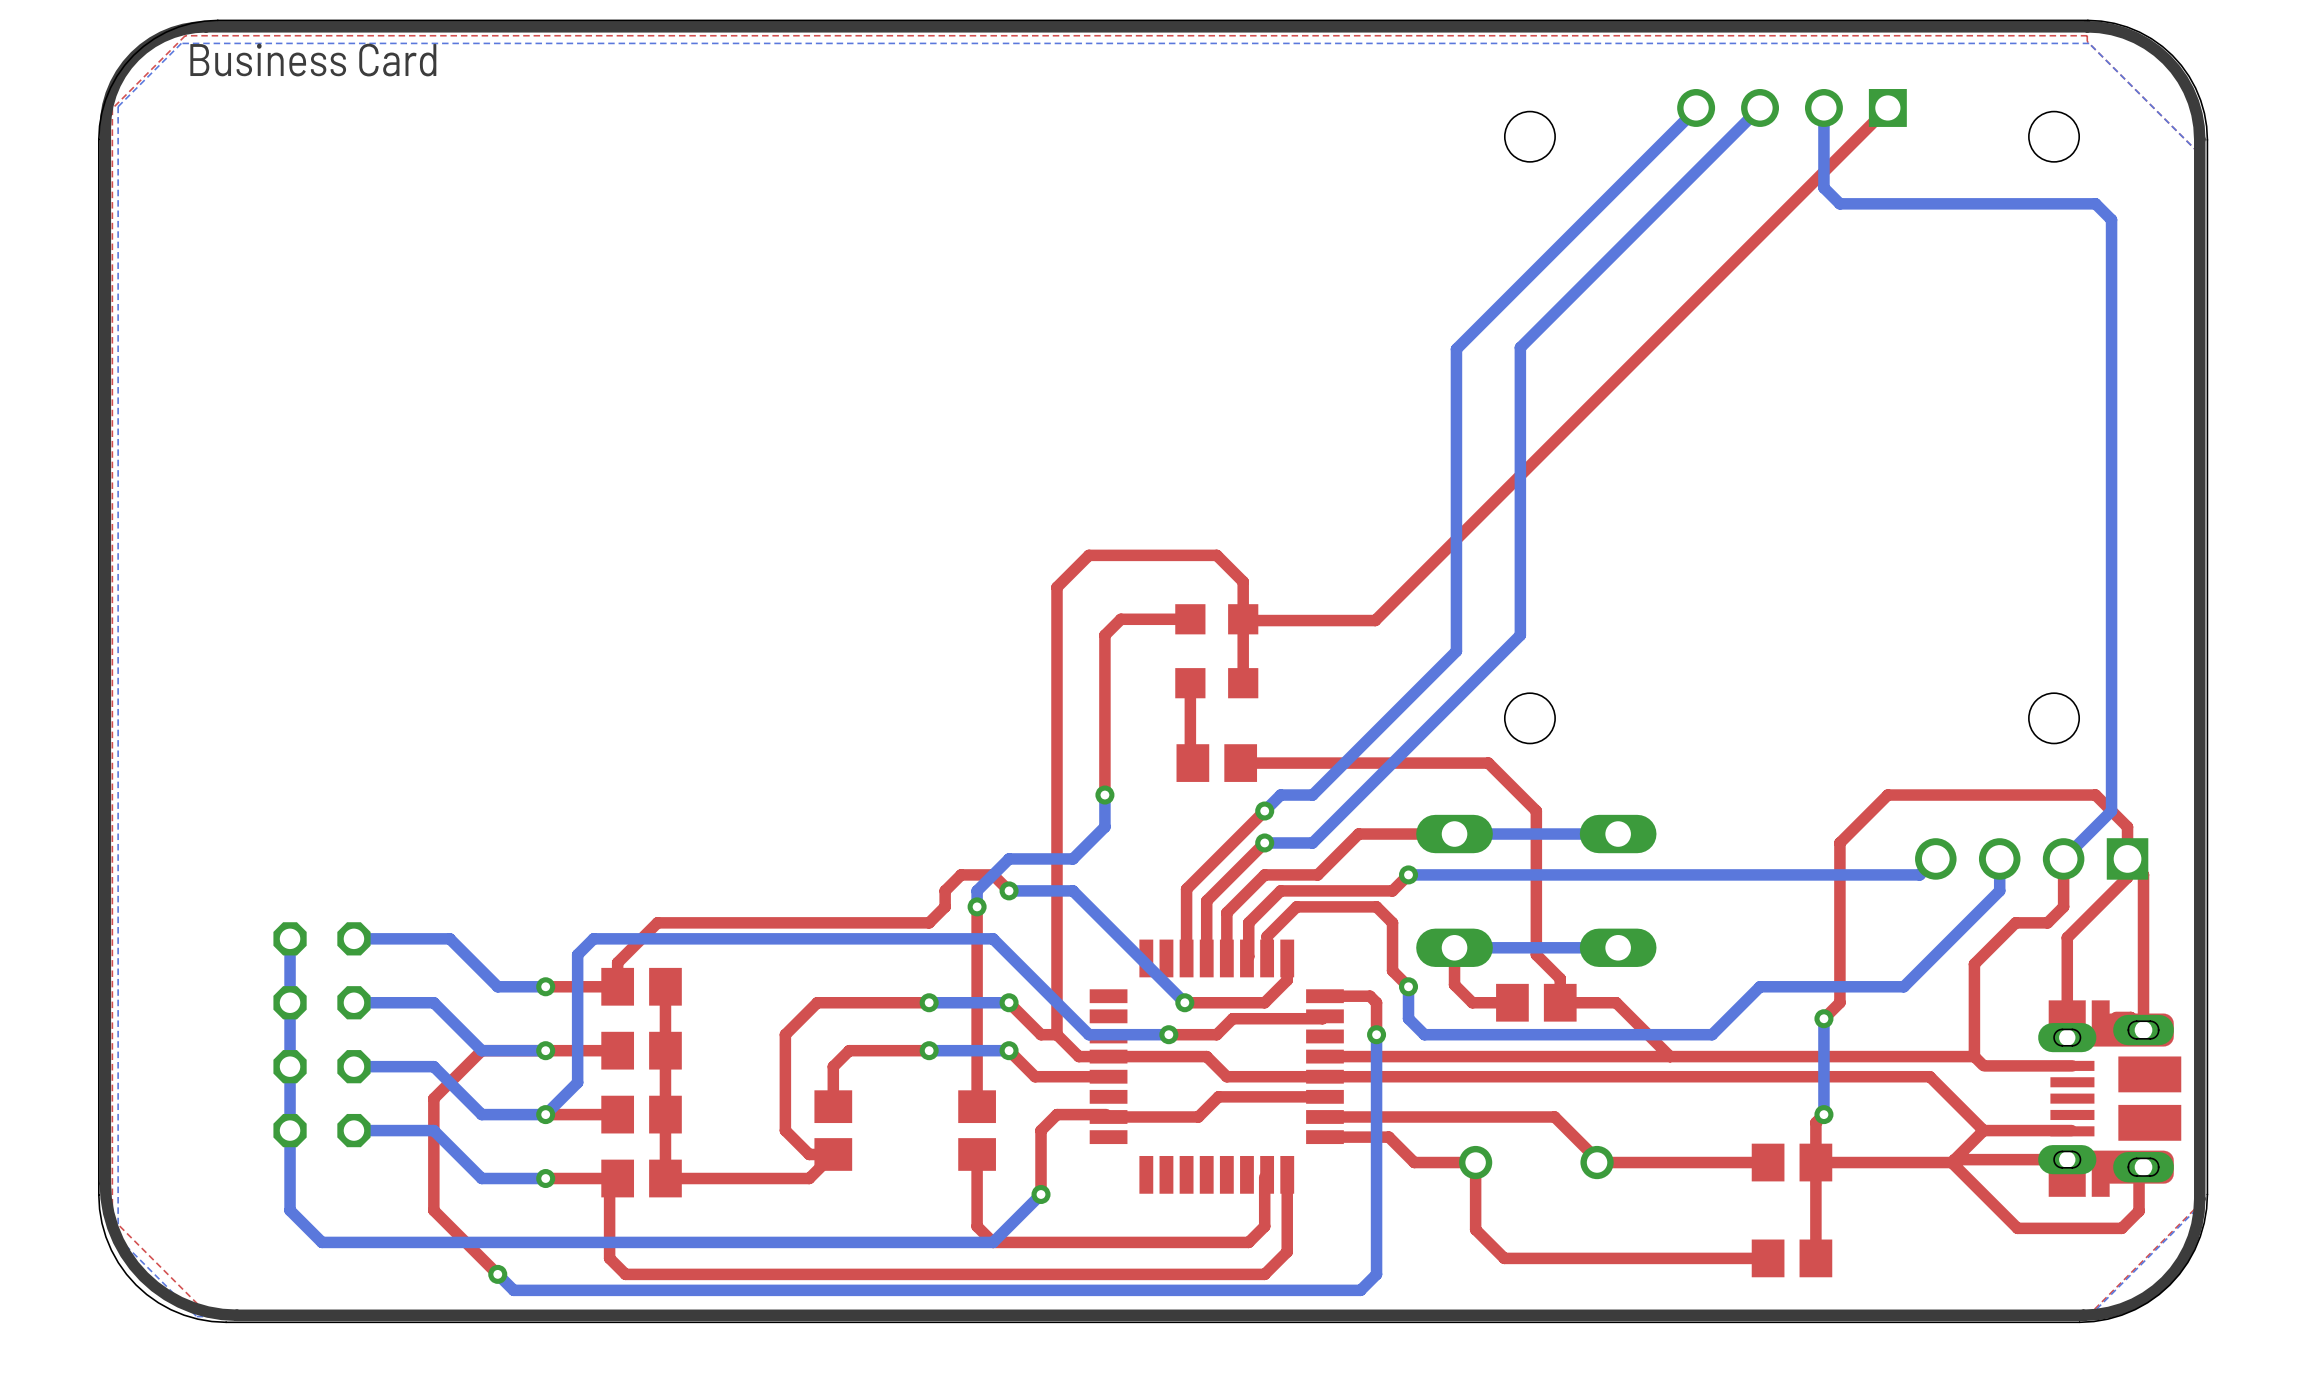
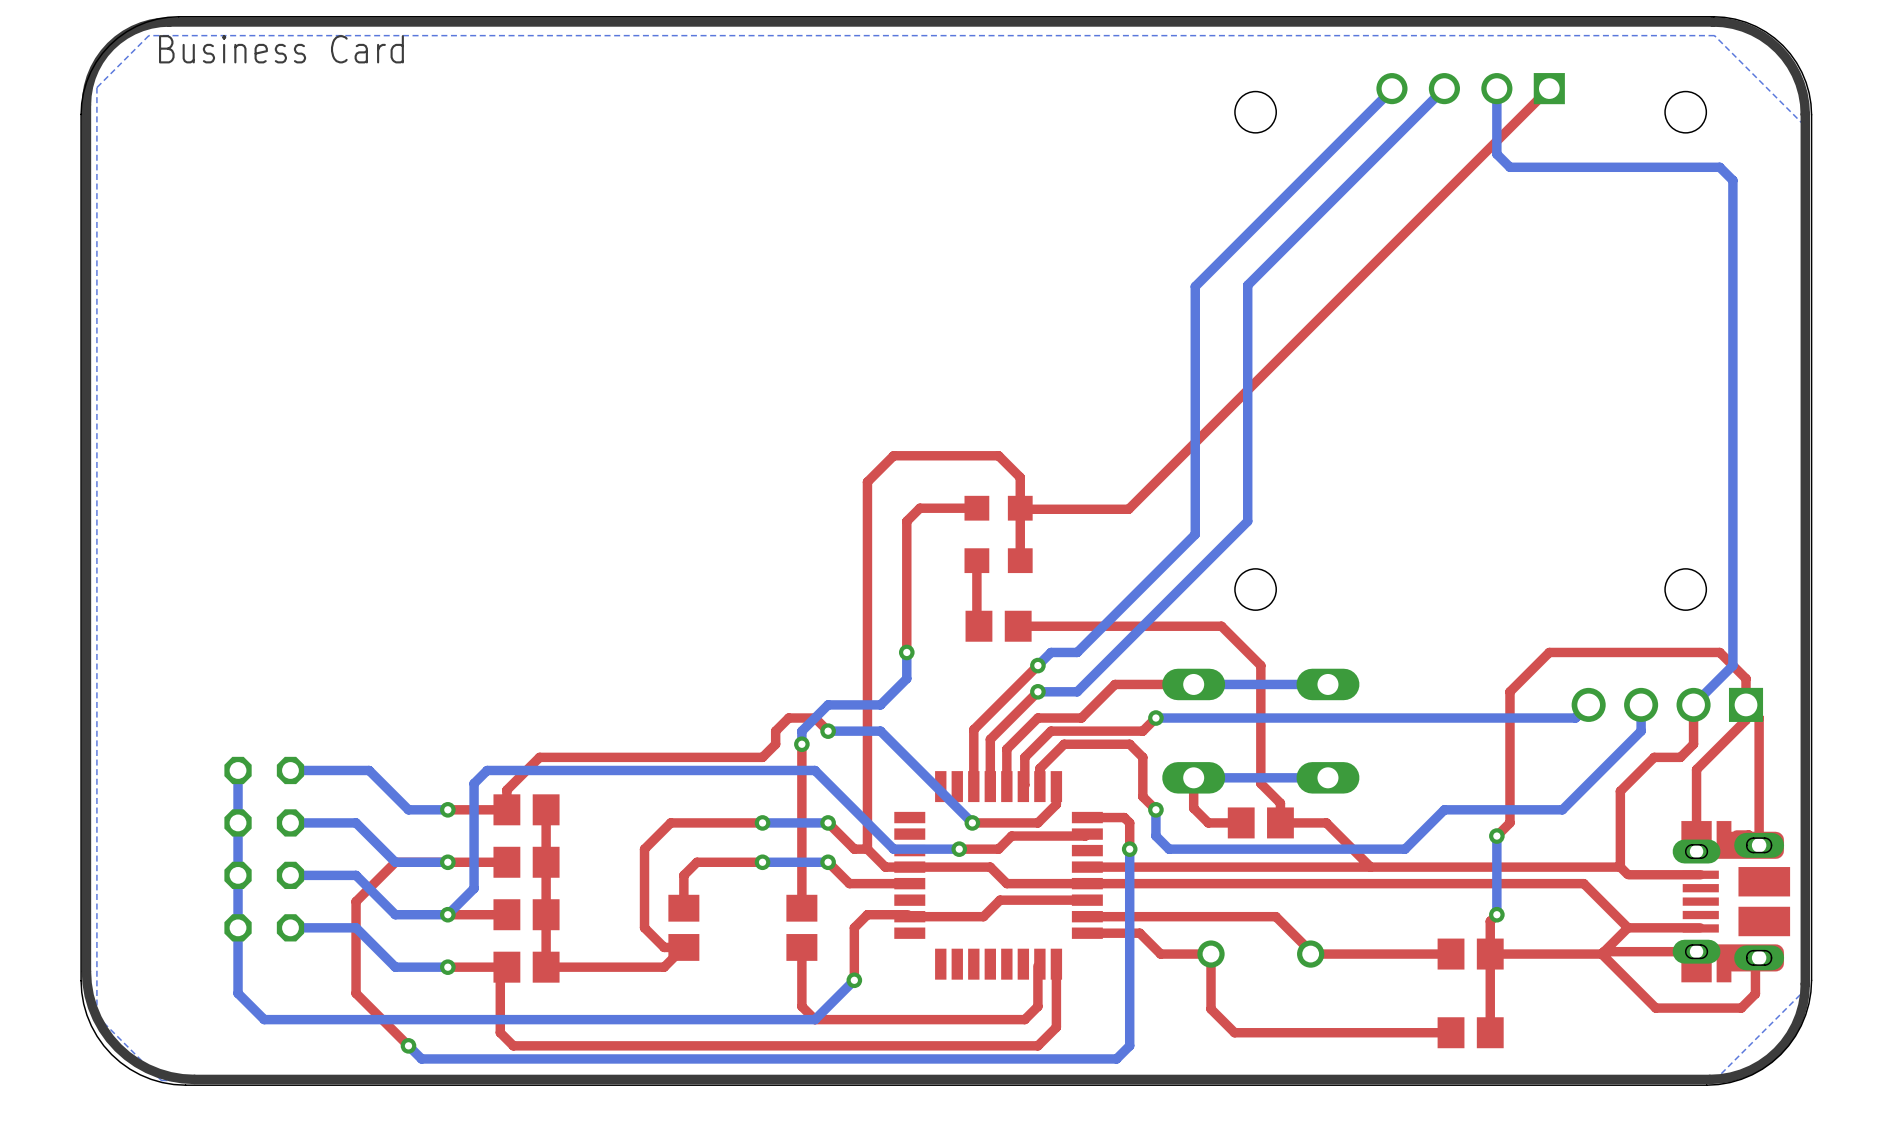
top zone outline: (2087, 35) (2087, 41) (2200, 154) (2200, 1203) (2087, 1316) (210, 1316) (112, 1218) (112, 108) (185, 35) (2087, 35) -> none

